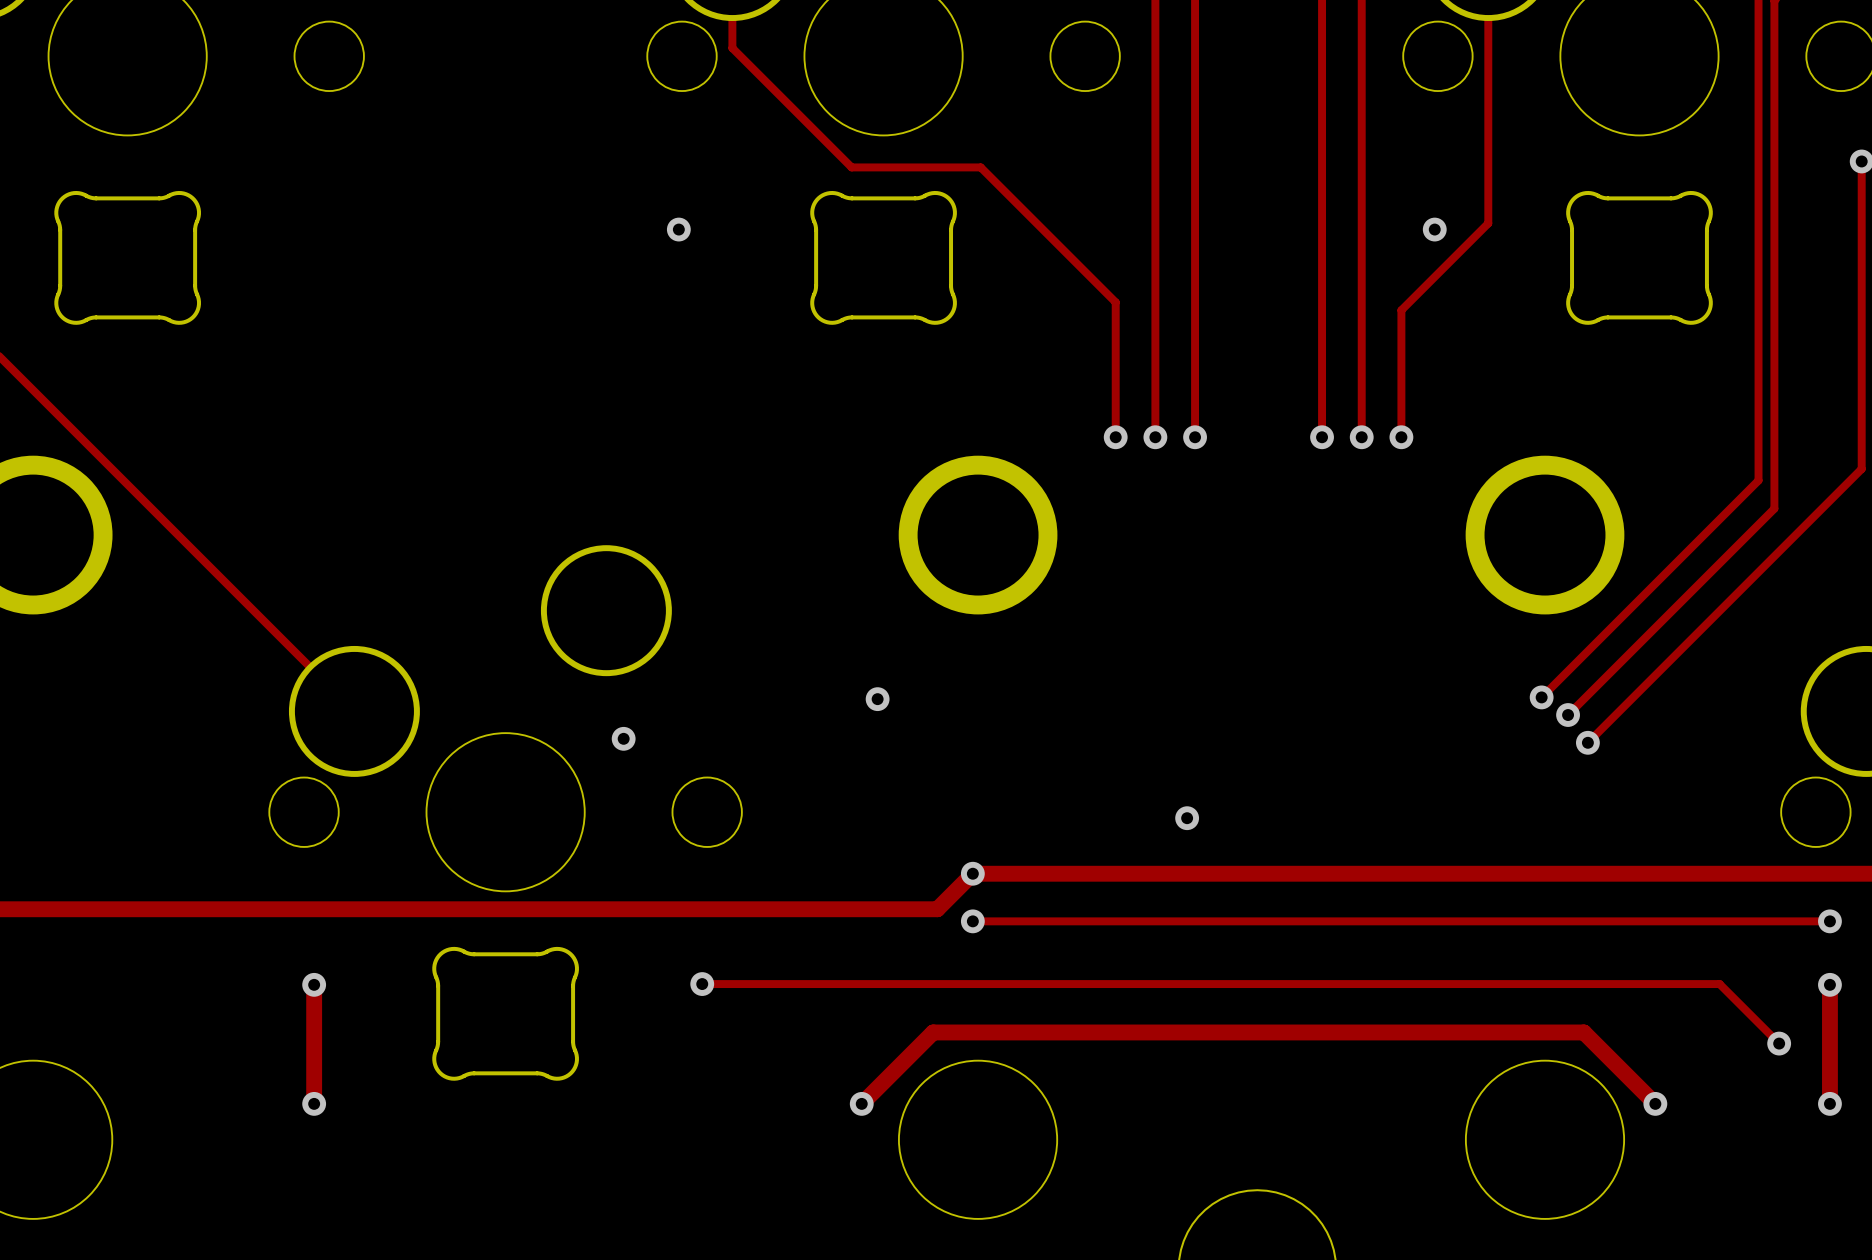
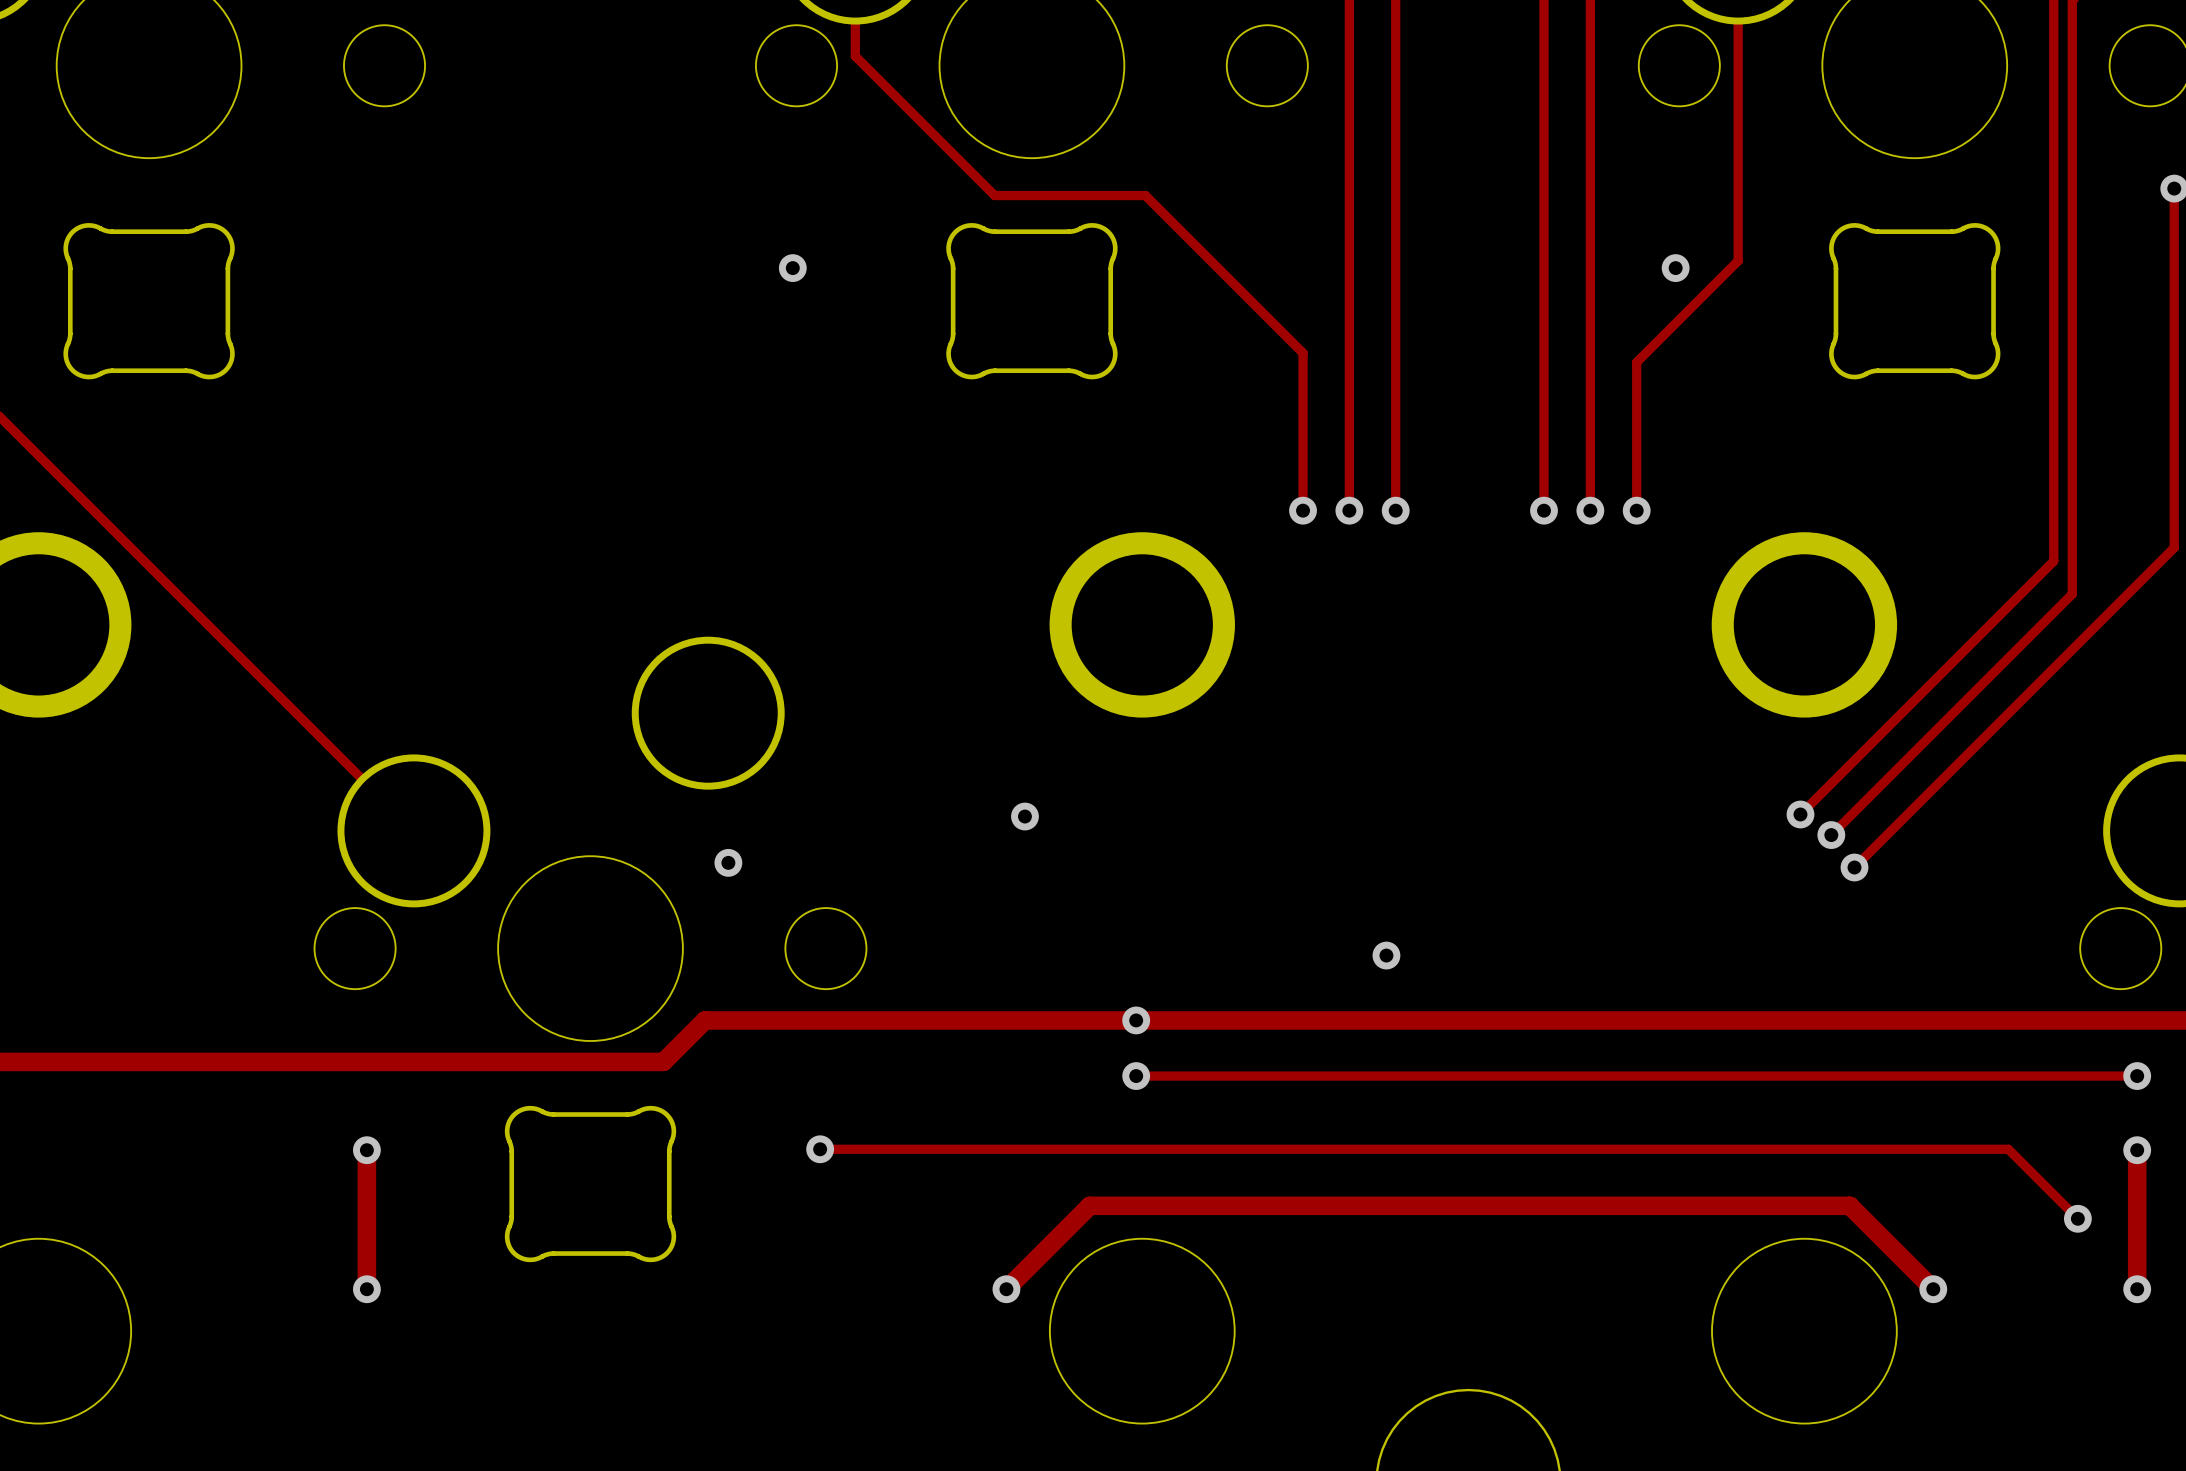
track: (972, 873) (937, 909) (568, 909) -> (1136, 1020) (704, 1020) (663, 1061)

